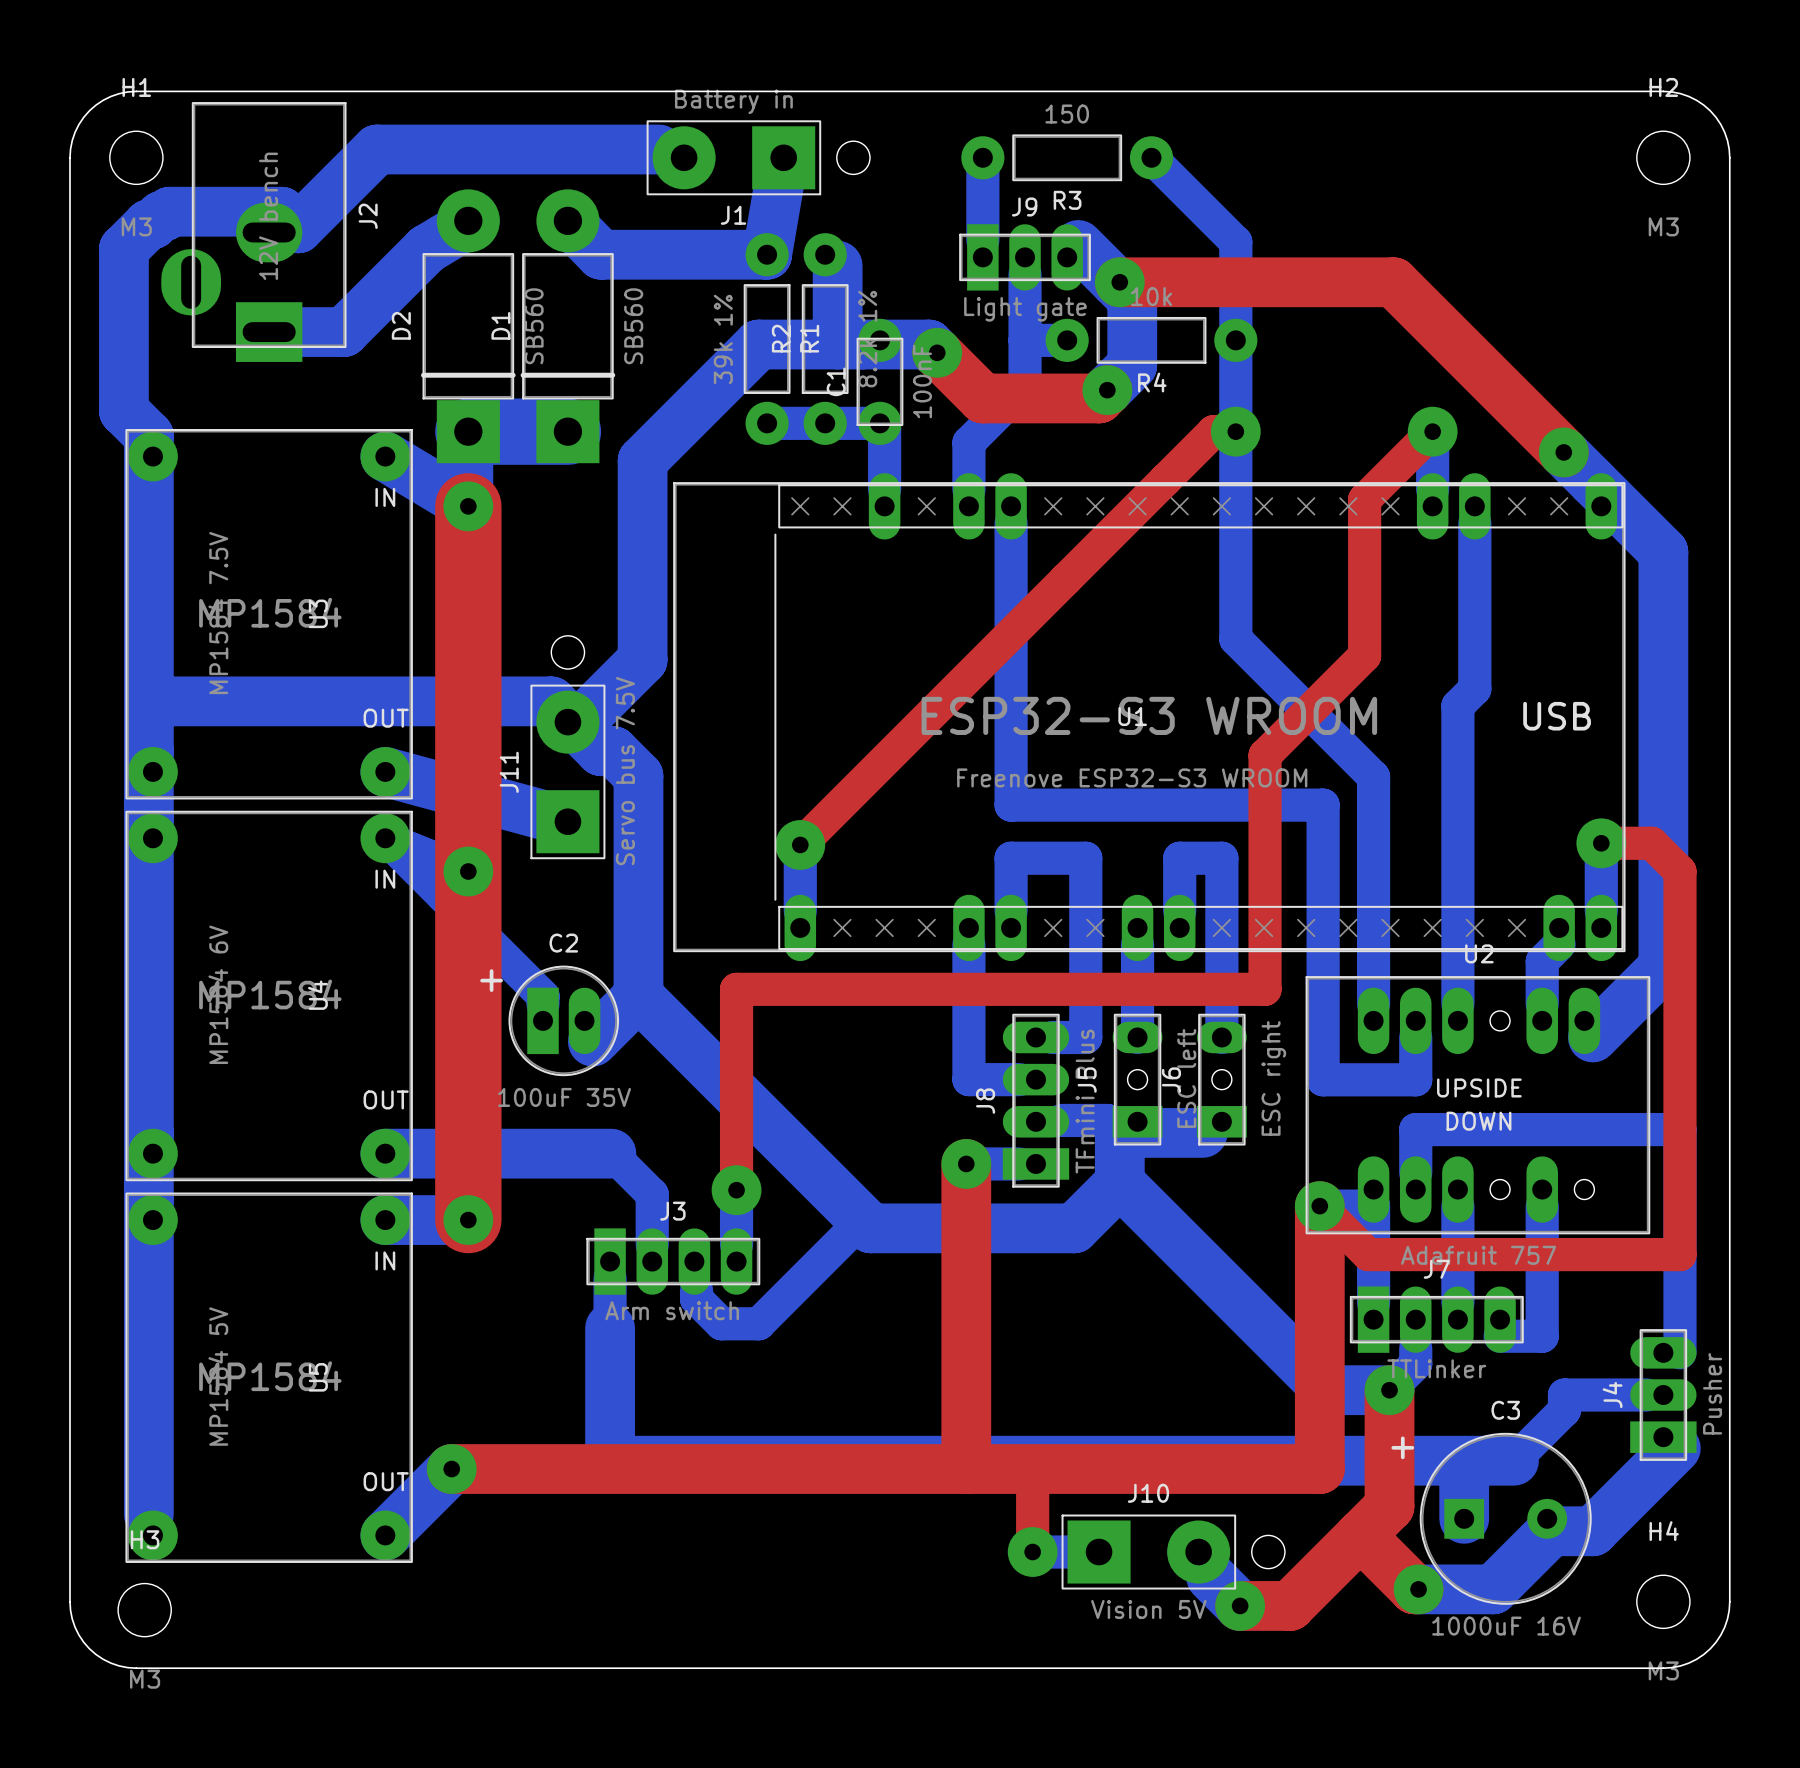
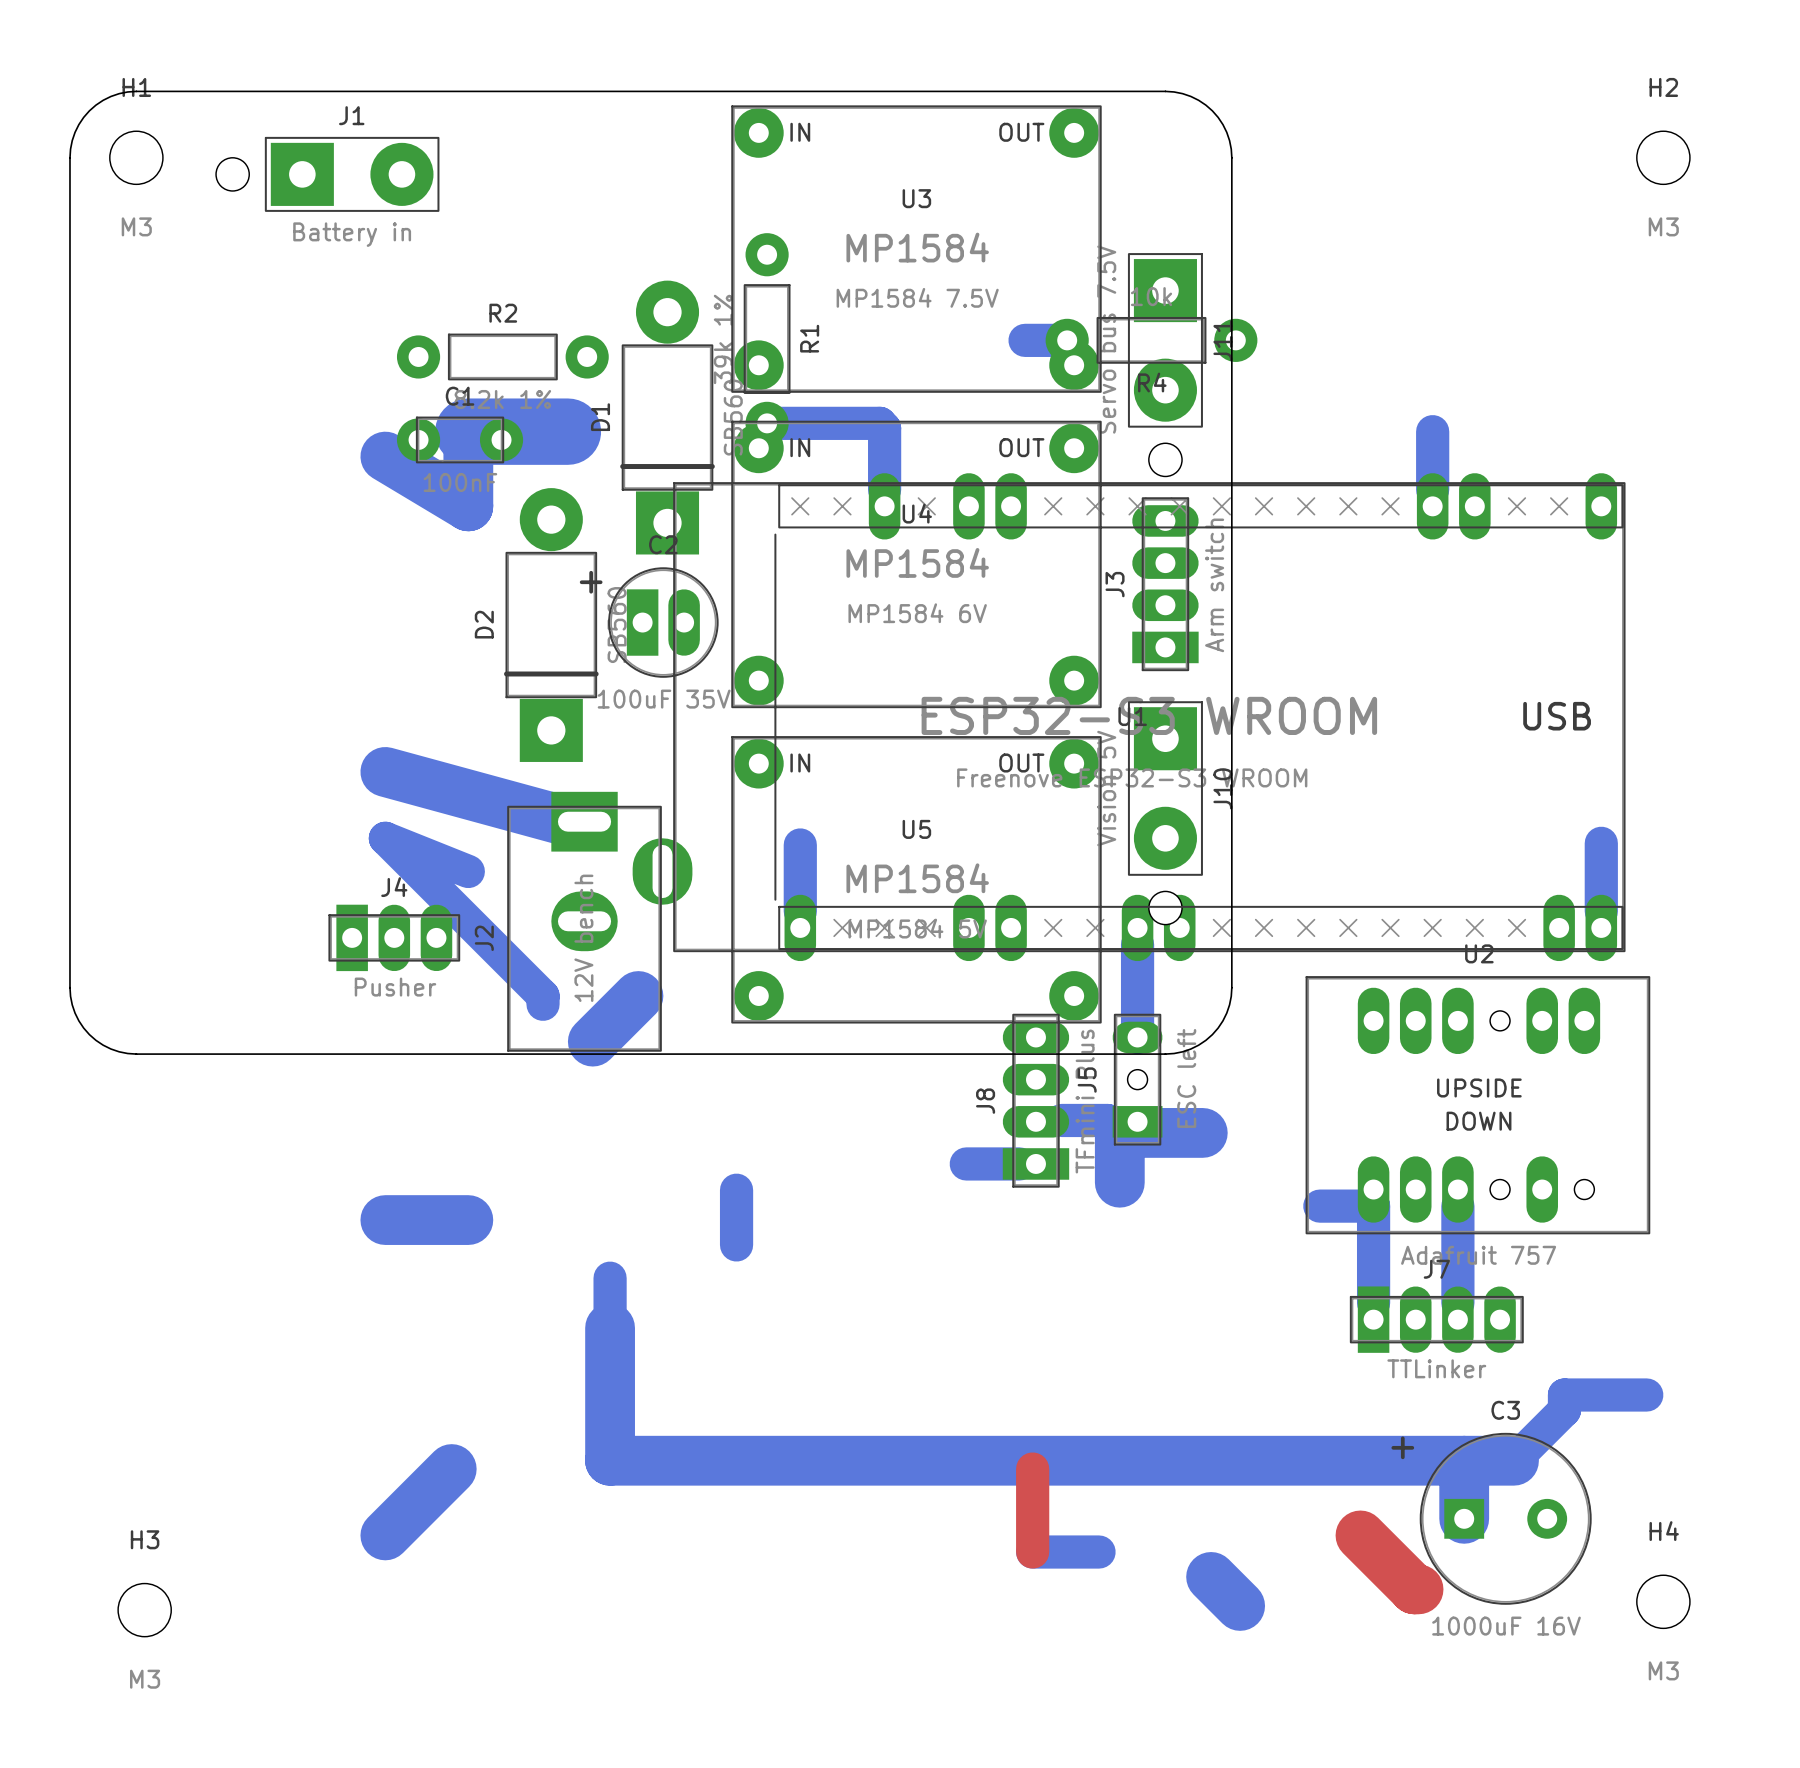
board edge: (1165, 91) (1672, 91) (1688, 96) (1703, 105) (1716, 117) (1724, 132) (1729, 157) (1729, 1601) (1724, 1627) (1716, 1642) (1703, 1654) (1688, 1663) (1663, 1668) (136, 1668) (110, 1663) (89, 1648) (78, 1635) (72, 1618) (69, 1601) (69, 987) -> (1165, 91) (1190, 96) (1212, 110) (1226, 132) (1231, 157) (1231, 987) (1229, 1004) (1222, 1020) (1205, 1040) (1190, 1049) (1165, 1054) (136, 1054) (110, 1049) (89, 1034) (75, 1013) (69, 987)
bottom track: (659, 149) (377, 149) (298, 228) (281, 211) (169, 211) (165, 215) (161, 215) (152, 224) (148, 224) (123, 249) (123, 410) (148, 435) (148, 1514) -> none
J1 rotation: 0° (758, 157) -> 180° (327, 174)
J1 position: (758, 157) -> (327, 174)
bottom track: (783, 157) (767, 254) (601, 254) (567, 220) -> none
bottom track: (982, 157) (982, 240) -> none
R3: 150 (1067, 157) -> none
bottom track: (1151, 157) (1235, 242) (1235, 639) (1373, 776) (1373, 1004) -> none
bottom track: (468, 220) (468, 224) (426, 249) (343, 332) (269, 332) -> none
J2 rotation: 0° (253, 231) -> 180° (599, 921)
J2 position: (253, 231) -> (599, 921)
bottom track: (1078, 244) (1132, 298) (1132, 365) (1107, 390) -> none
J9: Light gate (1025, 257) -> none
bottom track: (837, 265) (837, 344) -> none
bottom track: (1025, 273) (1025, 386) (968, 442) (968, 489) -> none
top track: (1119, 282) (1393, 282) (1563, 452) -> none
via: (1119, 282) -> none
D2 position: (468, 326) -> (551, 625)
D1 position: (567, 326) -> (667, 417)
R2 rotation: 0° (825, 339) -> 90° clockwise (502, 356)
R2 position: (825, 339) -> (502, 356)
bottom track: (937, 352) (928, 344) (758, 344) (642, 460) (642, 659) (576, 726) -> none
top track: (937, 352) (982, 398) (1099, 398) (1107, 390) -> none
via: (937, 352) -> none
C1 rotation: 0° (879, 381) -> 90° clockwise (460, 439)
C1 position: (879, 381) -> (460, 439)
via: (1107, 390) -> none
top track: (1235, 431) (1213, 431) (800, 844) -> none
via: (1235, 431) -> none
top track: (1432, 431) (1364, 499) (1364, 655) (1265, 755) (1265, 989) (736, 989) (736, 1190) -> none
via: (1432, 431) -> none
bottom track: (1563, 452) (1663, 551) (1663, 966) (1592, 1037) -> none
via: (1563, 452) -> none
top track: (468, 506) (468, 1220) -> none
via: (468, 506) -> none
bottom track: (1011, 522) (1011, 805) (1323, 805) (1323, 1079) (1415, 1079) (1415, 1037) -> none
bottom track: (1474, 522) (1474, 688) (1457, 705) (1457, 1004) -> none
U3 rotation: 0° (269, 614) -> 90° counterclockwise (916, 249)
U3 position: (269, 614) -> (916, 249)
bottom track: (148, 701) (551, 701) (601, 751) (613, 751) (638, 776) (638, 995) (870, 1228) (1074, 1228) (1119, 1182) (1327, 1390) (1389, 1390) (1415, 1363) (1415, 1348) -> none
J11 rotation: 0° (567, 747) -> 180° (1165, 364)
J11 position: (567, 747) -> (1165, 364)
top track: (1601, 843) (1651, 843) (1679, 871) (1679, 1254) (1368, 1254) (1319, 1206) (1319, 1469) (451, 1469) -> none
via: (1601, 843) -> none
via: (800, 844) -> none
via: (468, 871) -> none
bottom track: (1011, 911) (1011, 858) (1085, 858) (1085, 1037) (1052, 1037) -> none
bottom track: (1179, 911) (1179, 858) (1221, 858) (1221, 1037) -> none
bottom track: (968, 944) (968, 1079) (1019, 1079) -> none
bottom track: (1559, 944) (1542, 961) (1542, 1004) -> none
U4 rotation: 0° (269, 995) -> 90° counterclockwise (916, 564)
U4 position: (269, 995) -> (916, 564)
C2 position: (563, 1020) -> (663, 622)
J6: ESC right (1221, 1079) -> none
bottom track: (385, 1153) (611, 1153) (652, 1194) (652, 1244) -> none
top track: (966, 1163) (966, 1469) -> none
via: (966, 1163) -> none
bottom track: (1415, 1172) (1415, 1129) (1679, 1129) (1679, 1352) -> none
via: (736, 1190) -> none
via: (1319, 1206) -> none
bottom track: (1542, 1206) (1542, 1336) (1500, 1336) -> none
via: (468, 1220) -> none
bottom track: (862, 1220) (758, 1323) (721, 1323) (696, 1298) (696, 1290) -> none
J3 rotation: 0° (673, 1261) -> 90° counterclockwise (1165, 584)
J3 position: (673, 1261) -> (1165, 584)
U5 rotation: 0° (269, 1377) -> 90° counterclockwise (916, 879)
U5 position: (269, 1377) -> (916, 879)
top track: (1389, 1390) (1389, 1506) (1289, 1605) (1240, 1605) -> none
via: (1389, 1390) -> none
J4 rotation: 0° (1663, 1395) -> 90° clockwise (394, 937)
J4 position: (1663, 1395) -> (394, 937)
bottom track: (1675, 1448) (1592, 1531) (1551, 1531) (1493, 1589) (1418, 1589) -> none
via: (451, 1469) -> none
via: (1032, 1552) -> none
J10 rotation: 0° (1173, 1552) -> 90° clockwise (1165, 812)
J10 position: (1173, 1552) -> (1165, 812)
via: (1418, 1589) -> none
via: (1240, 1605) -> none

